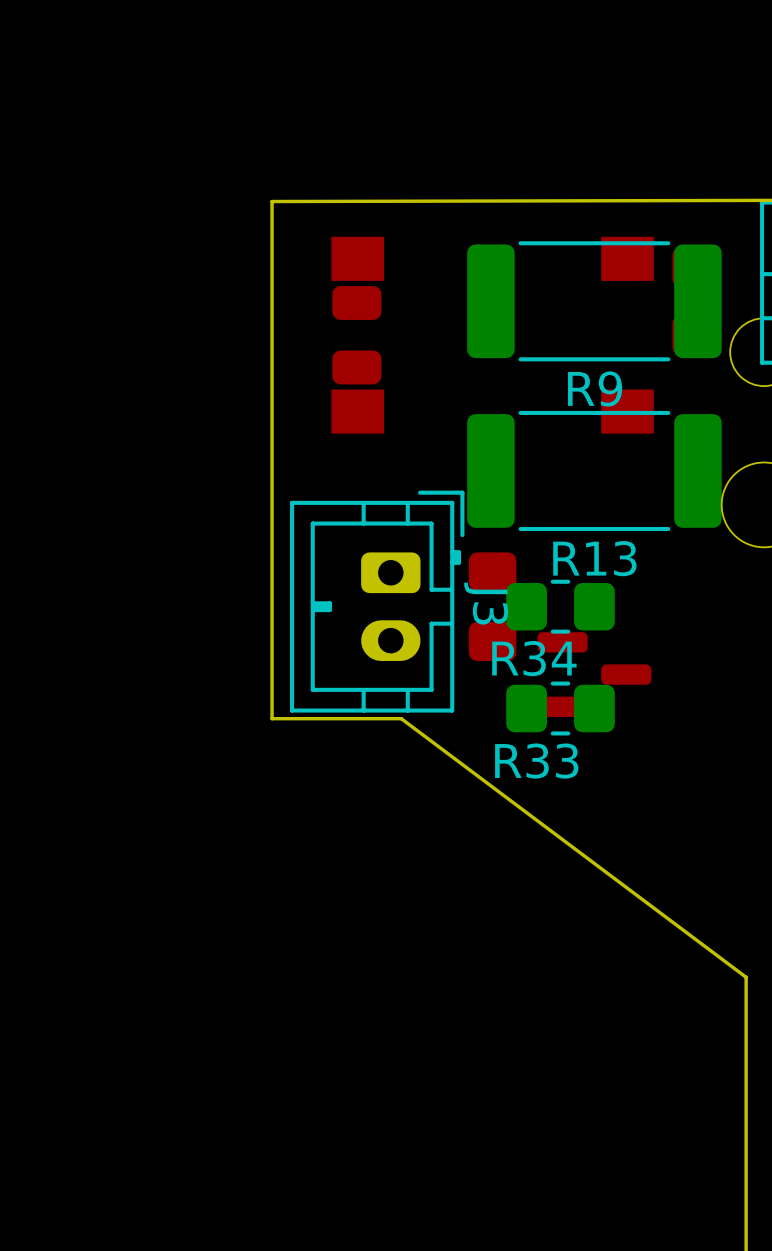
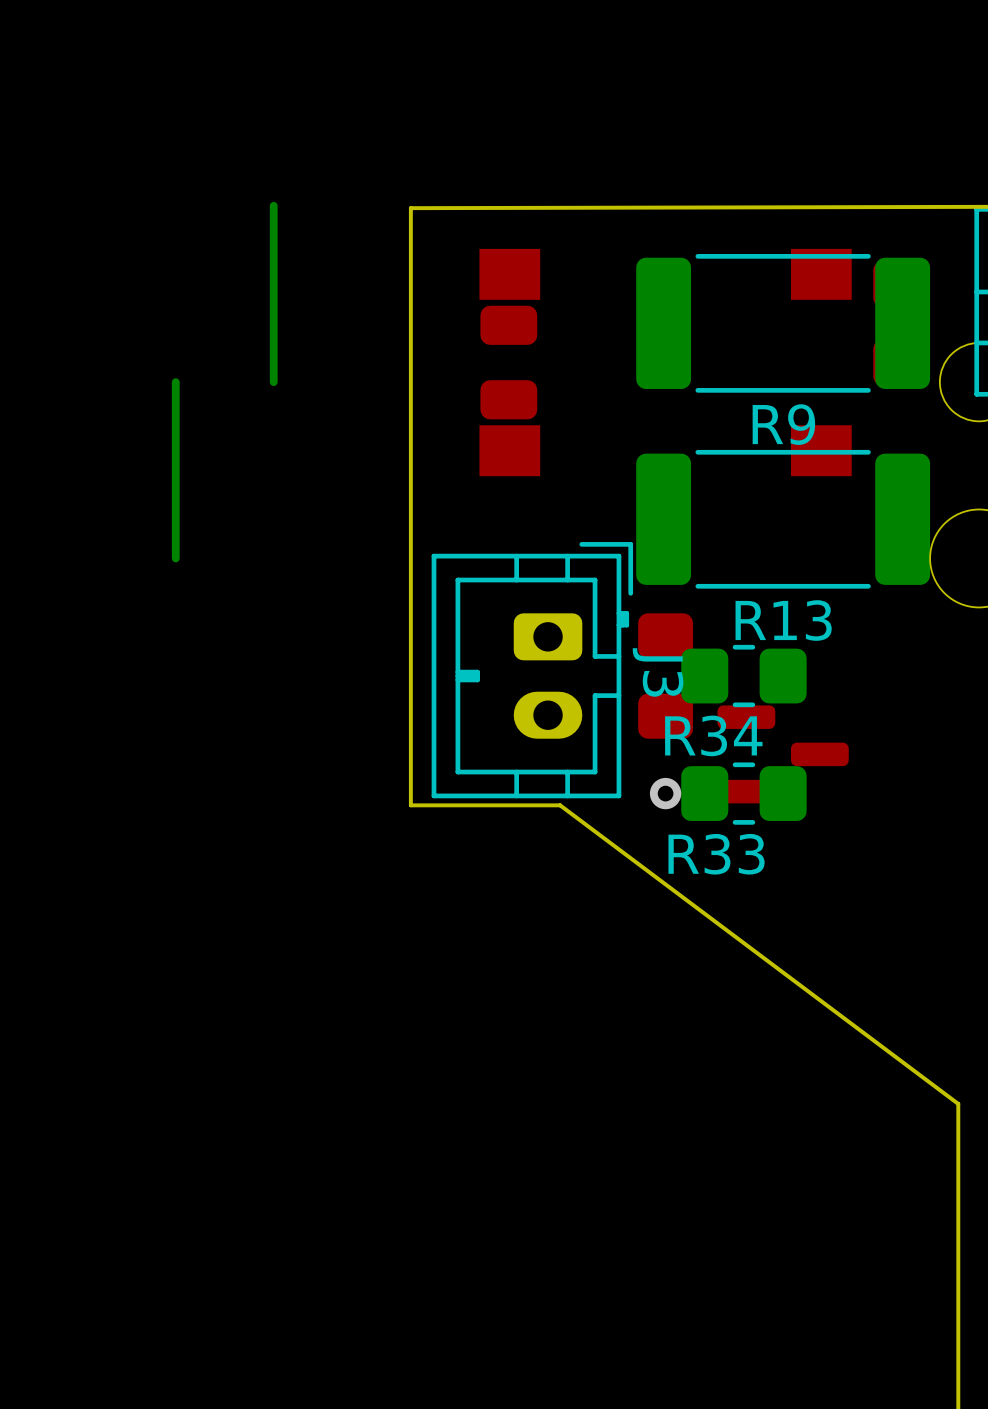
bottom track: none -> (273, 205) (273, 382)
bottom track: none -> (175, 382) (175, 558)
via: none -> (665, 793)

